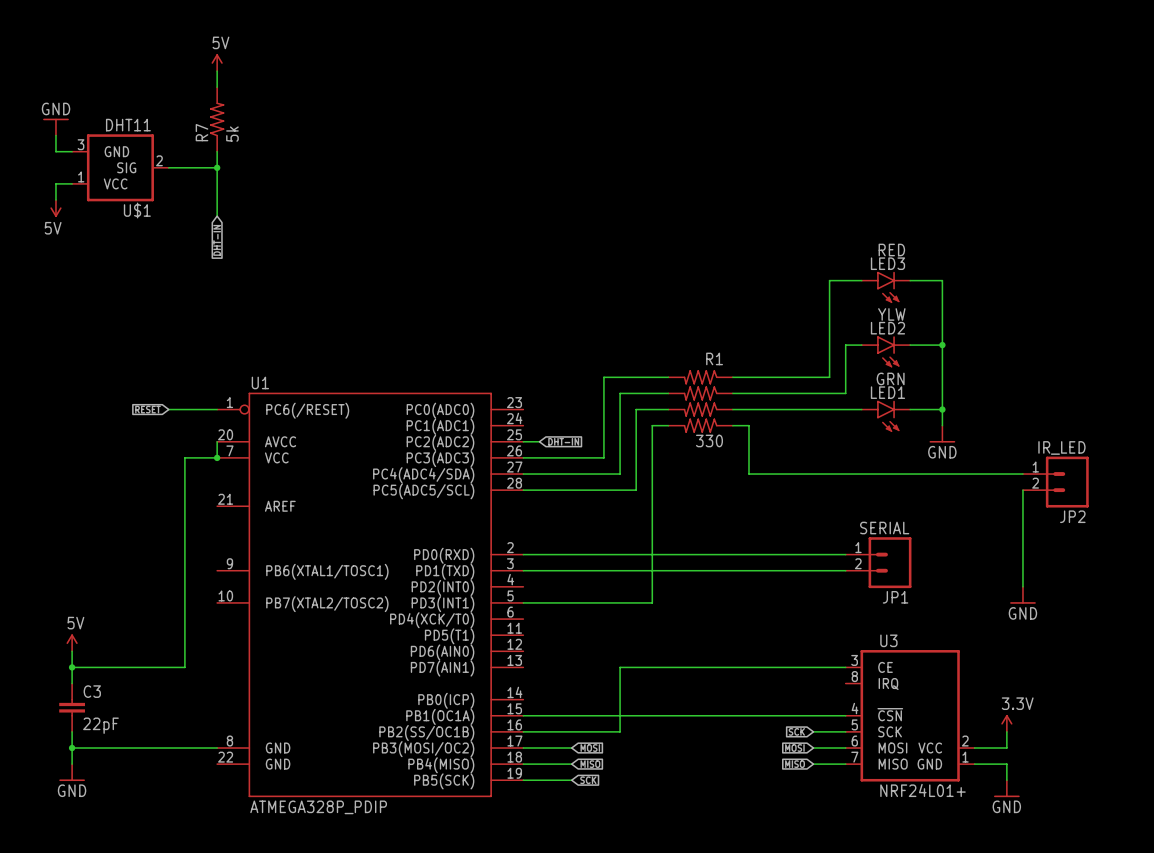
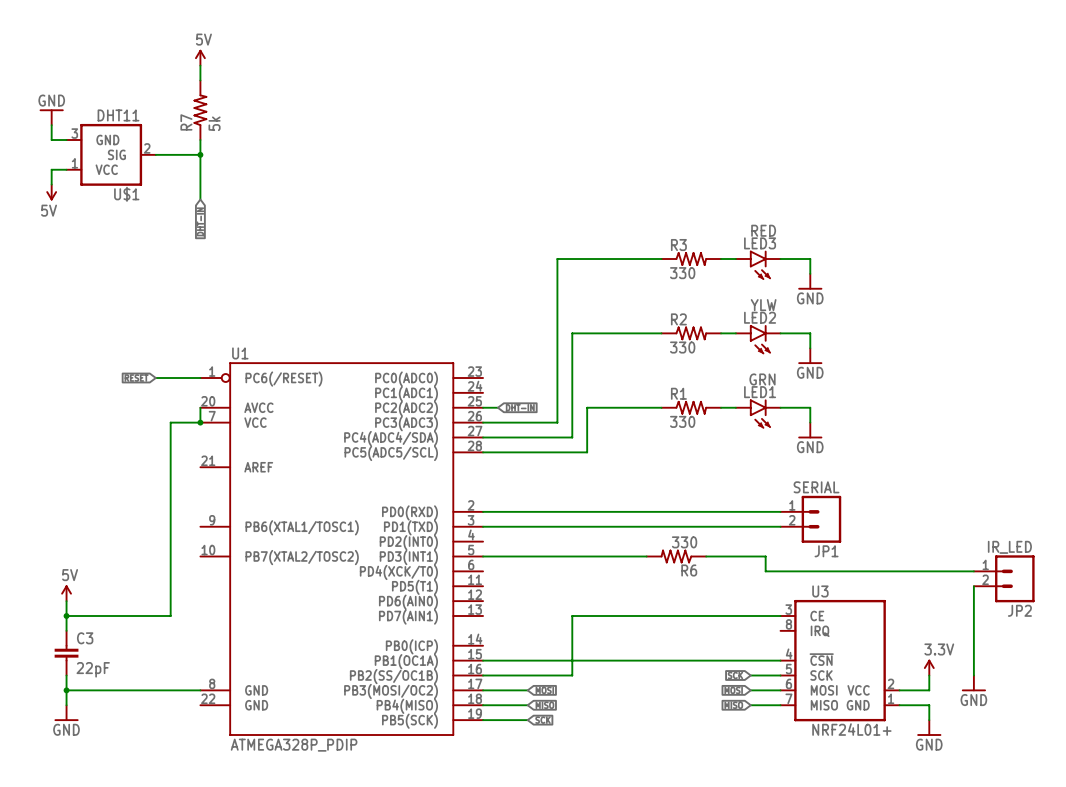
R3: none -> 330 (691, 259)
wire: none -> (721, 259) (735, 259)
wire: (845, 280) (829, 280) (829, 377) (732, 377) -> none
wire: (910, 280) (942, 280) (942, 425) -> none
LED3 position: (885, 287) -> (758, 265)
power symbol: none -> GND (810, 281)
wire: (861, 345) (845, 345) (845, 393) (732, 393) -> none
wire: (910, 345) (942, 345) -> none
junction: (942, 345) -> none
LED2 position: (885, 351) -> (758, 339)
R1 name position: R1 (714, 358) -> R1 (678, 393)
R2: none -> 330 (691, 333)
wire: none -> (721, 333) (735, 333)
wire: none -> (780, 333) (810, 333) (810, 348)
R1 symbol: [668, 370, 733, 433] -> [661, 401, 722, 415]
wire: (603, 377) (668, 377) -> (557, 348) (557, 259) (661, 259)
power symbol: none -> GND (810, 356)
wire: (620, 393) (668, 393) -> (572, 363) (572, 333) (661, 333)
wire: (668, 409) (636, 409) (636, 441) -> (661, 407) (587, 407)
wire: (732, 409) (861, 409) -> none
wire: (910, 409) (942, 409) -> none
junction: (942, 409) -> none
LED1 position: (885, 416) -> (758, 413)
wire: (668, 425) (652, 425) (652, 602) -> (646, 556) (602, 556)
wire: (732, 425) (749, 425) (749, 474) (1022, 474) -> none
power symbol: GND (942, 434) -> none
R1 value position: 330 (709, 440) -> 330 (682, 421)
wire: none -> (721, 407) (735, 407)
wire: none -> (780, 407) (810, 407) (810, 422)
power symbol: none -> GND (810, 430)
JP2 position: (1055, 482) -> (1004, 578)
wire: (1022, 490) (1022, 586) -> (973, 586) (973, 675)
power symbol: GND (1022, 595) -> none
R6: none -> 330 (676, 556)
wire: none -> (706, 556) (765, 556) (765, 571) (973, 571)
power symbol: none -> GND (973, 683)

